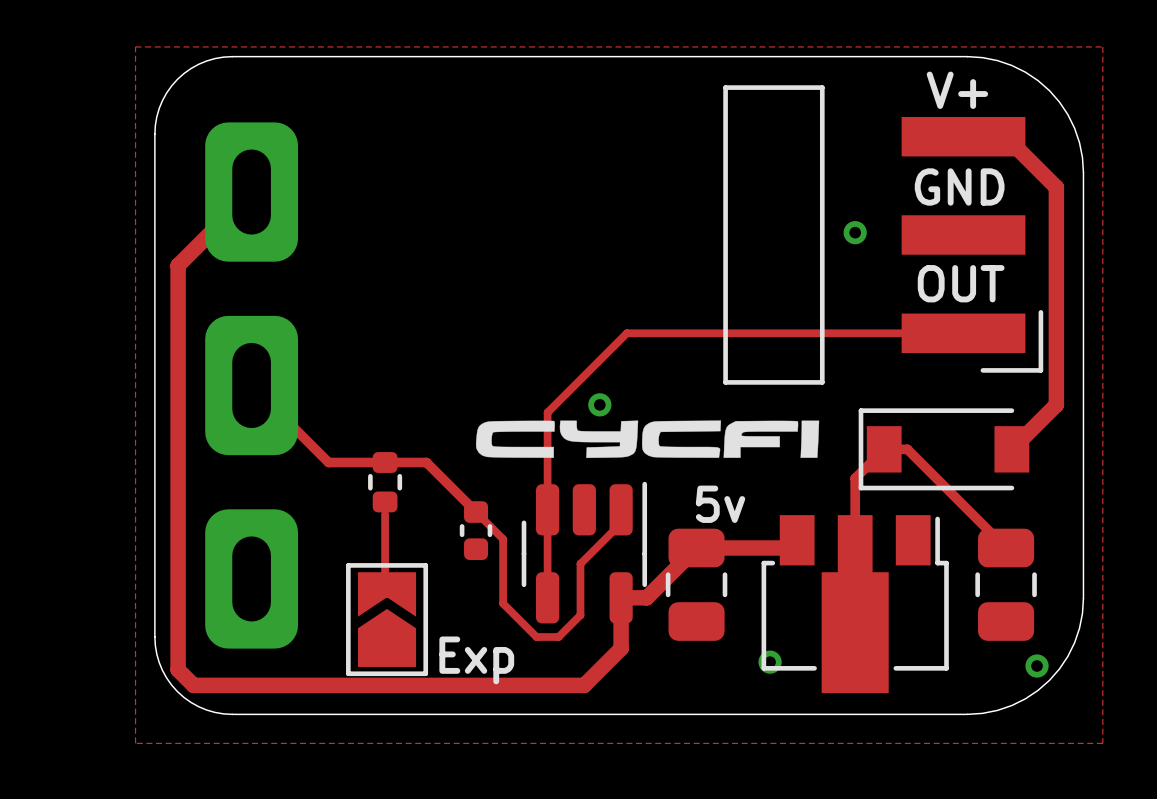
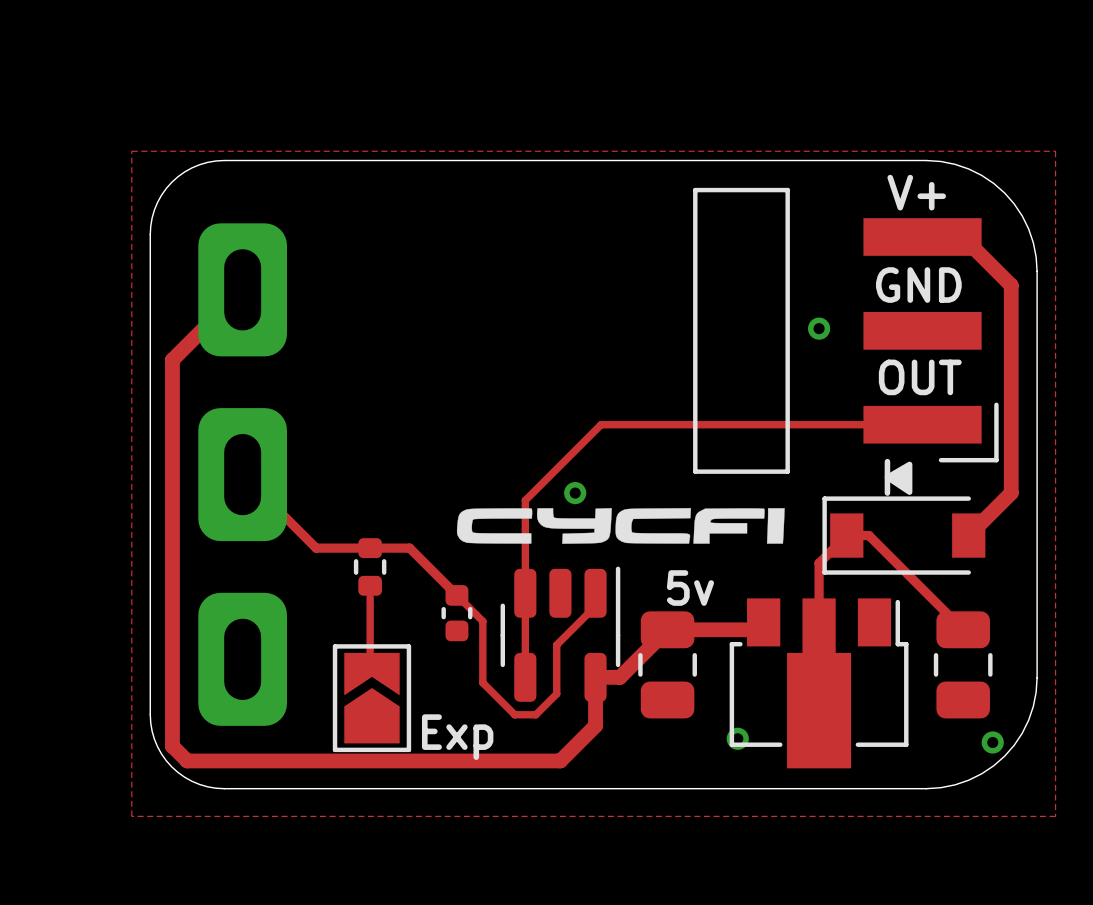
drawing: none -> [884, 461, 913, 495]
line: none -> (887, 461) (887, 493)

